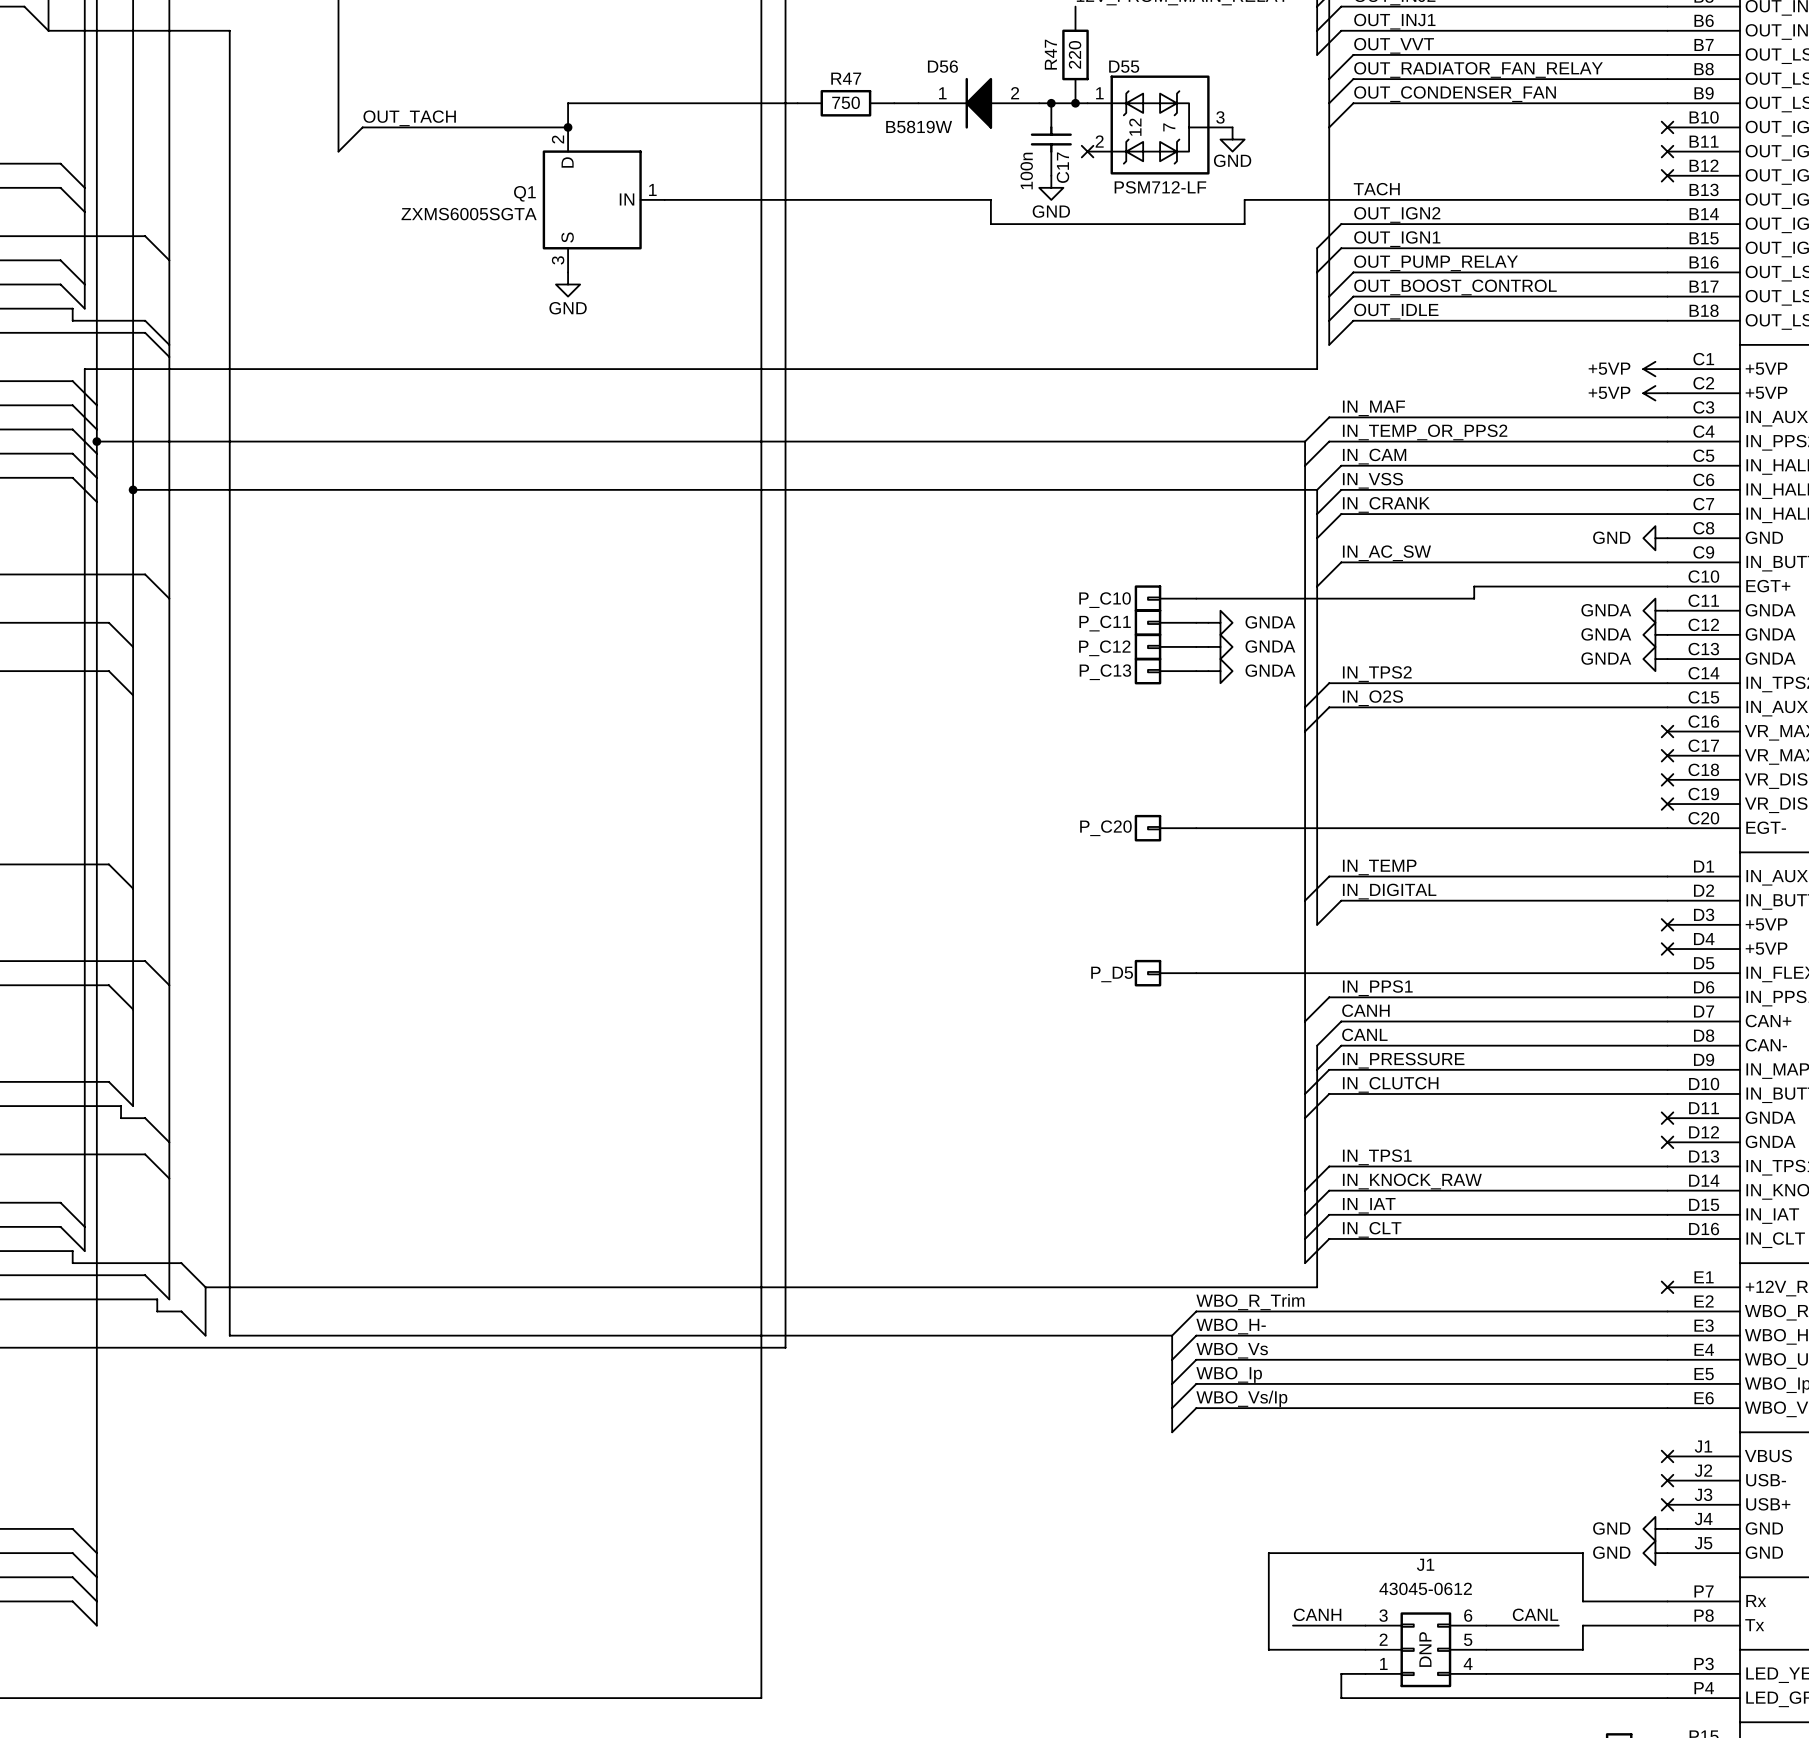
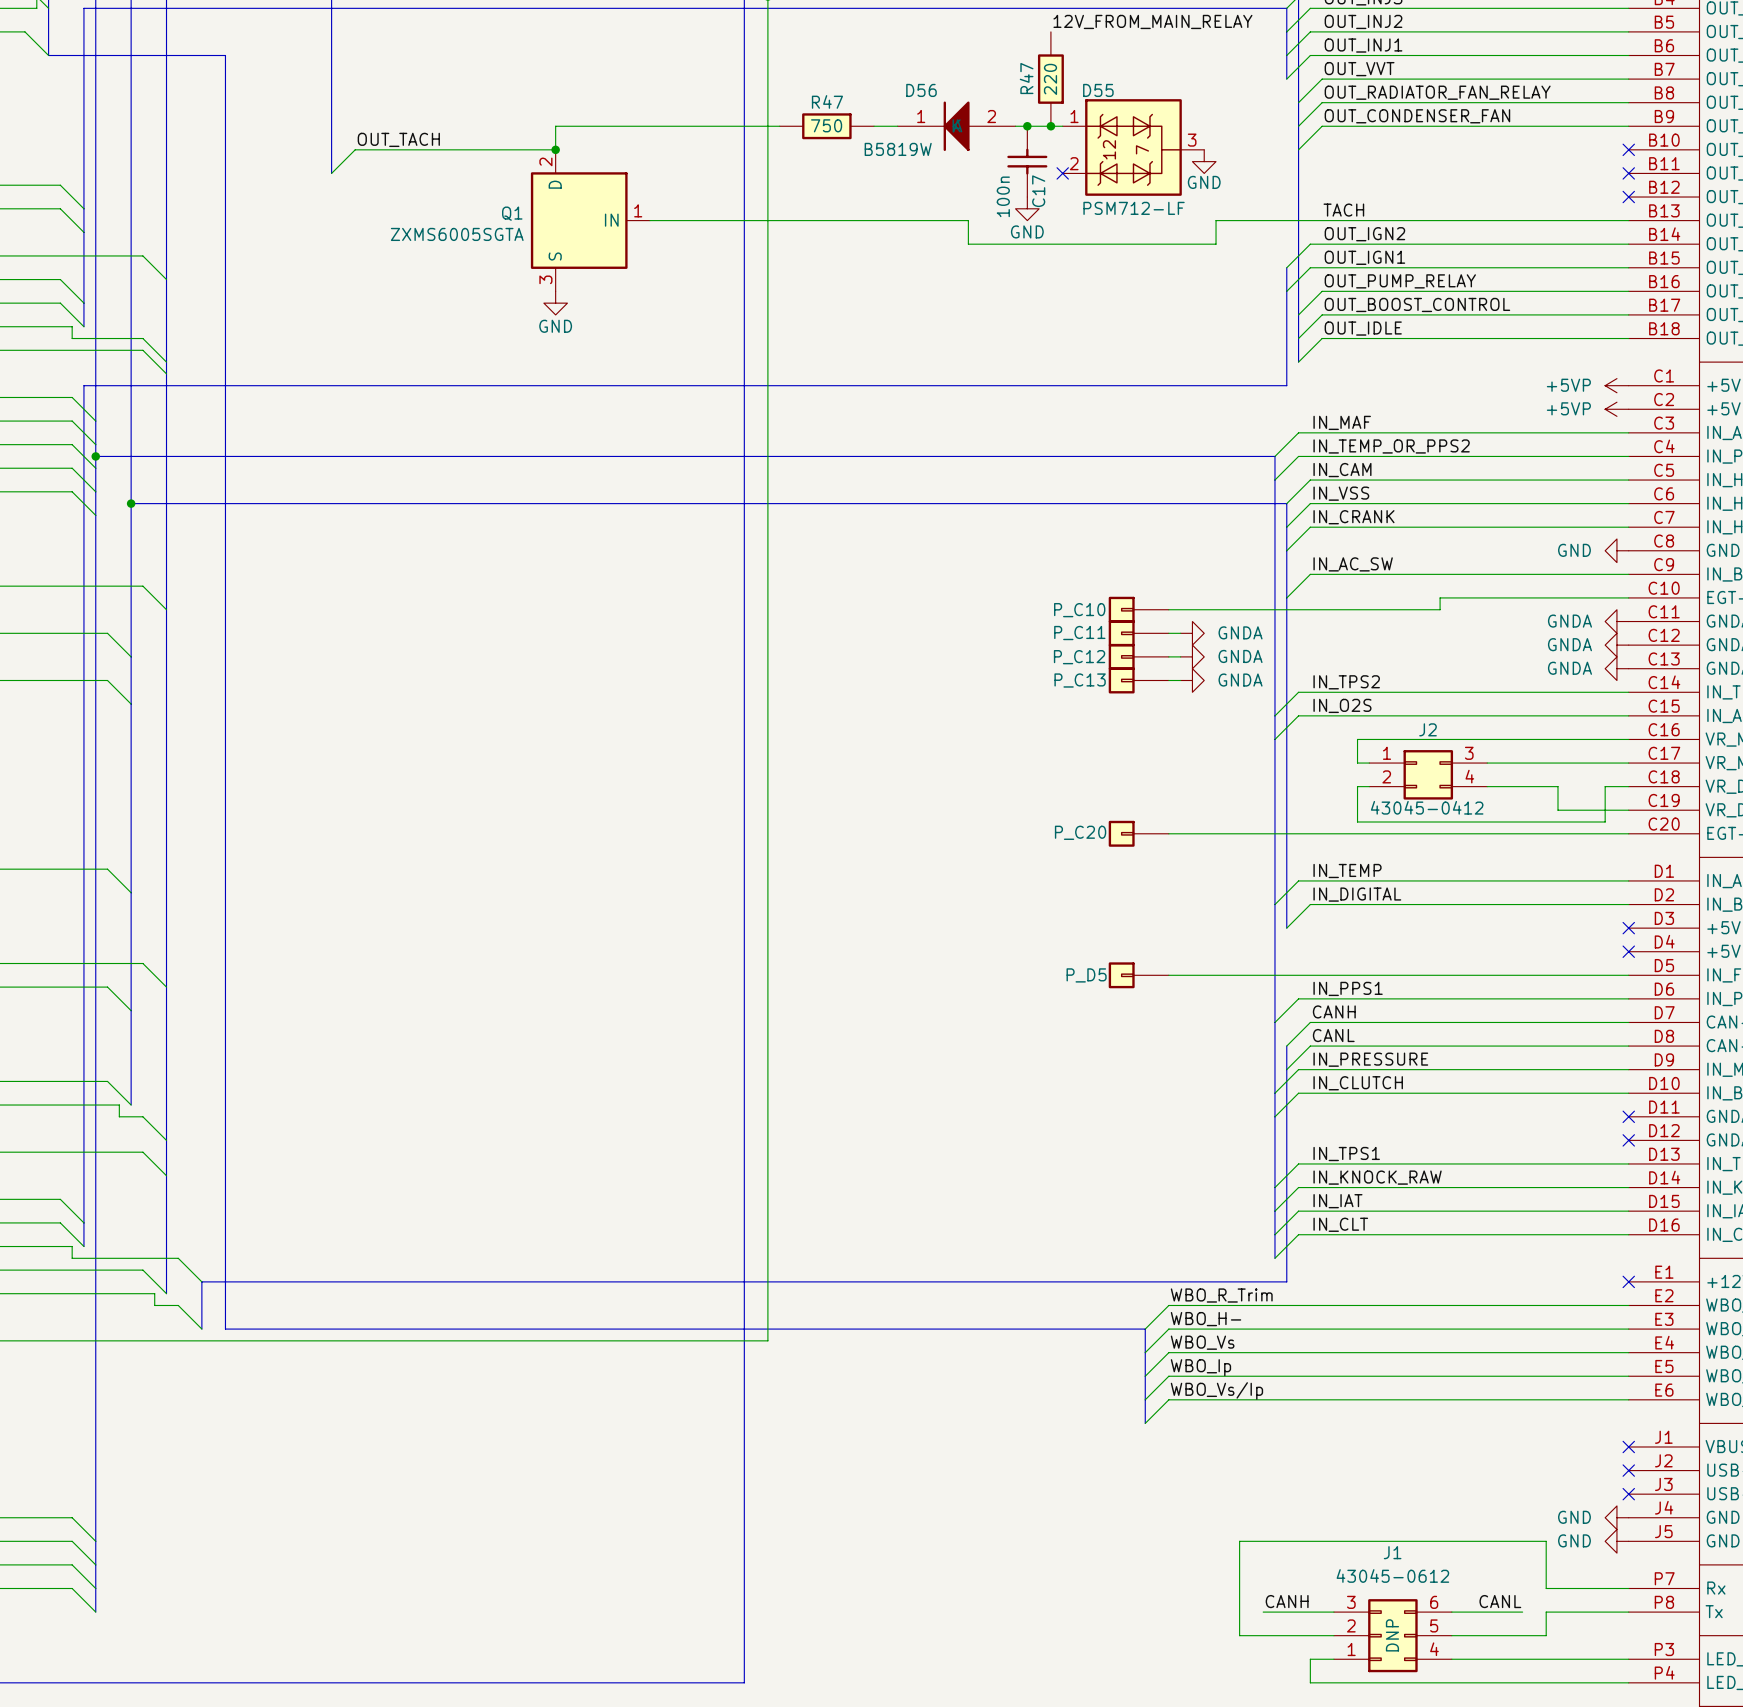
wire: none -> (1628, 739) (1357, 739) (1357, 763) (1369, 763)
no-connect mark: (1667, 731) -> none
wire: none -> (1487, 763) (1628, 763)
no-connect mark: (1667, 755) -> none
J2: none -> 43045-0412 (1428, 774)
wire: none -> (1369, 786) (1357, 786) (1357, 822) (1605, 822) (1605, 786) (1628, 786)
wire: none -> (1487, 786) (1557, 786) (1557, 810) (1628, 810)
no-connect mark: (1667, 779) -> none
no-connect mark: (1667, 804) -> none

